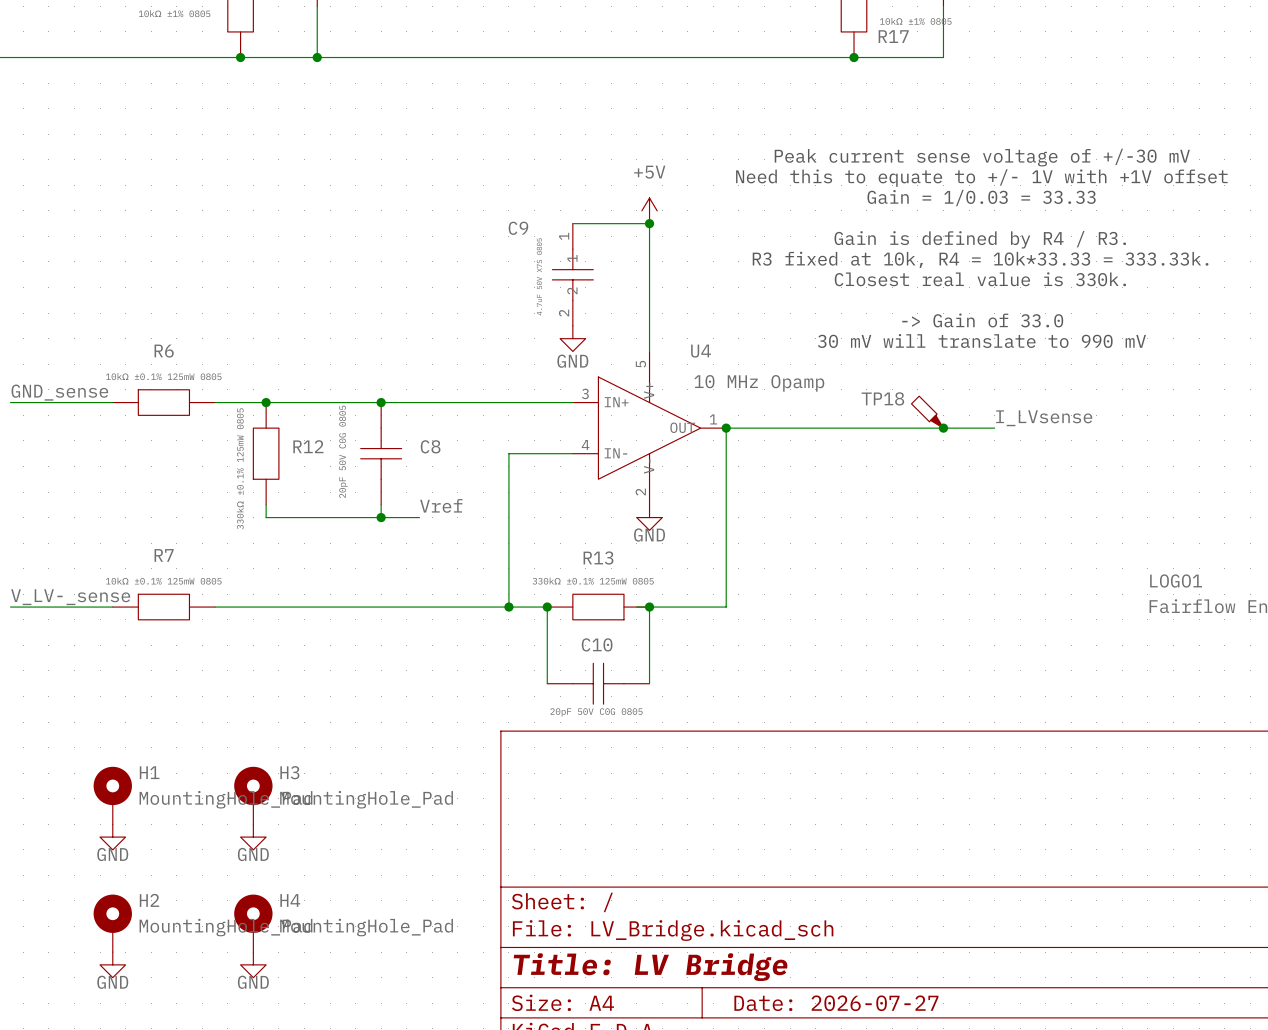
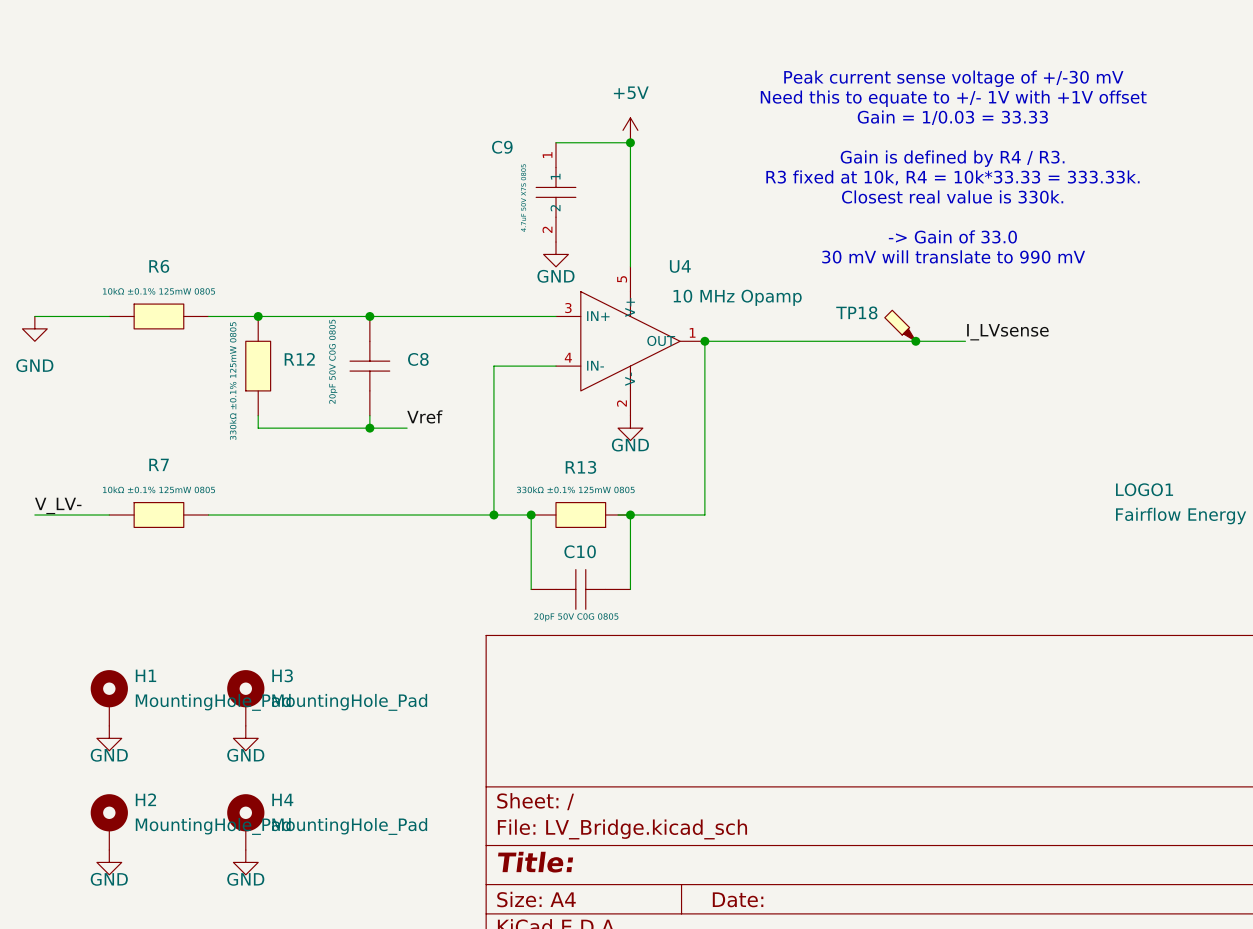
label: GND_sense (59, 392) -> none
wire: (10, 402) (36, 402) -> none
power symbol: none -> GND (34, 328)
label: V_LV-_sense (70, 597) -> V_LV- (58, 505)
wire: (10, 607) (36, 607) -> none
title block: Title: LV Bridge (650, 967) -> Title: (535, 862)
title block: Date: 2026-07-27 (836, 1003) -> Date: (738, 899)

